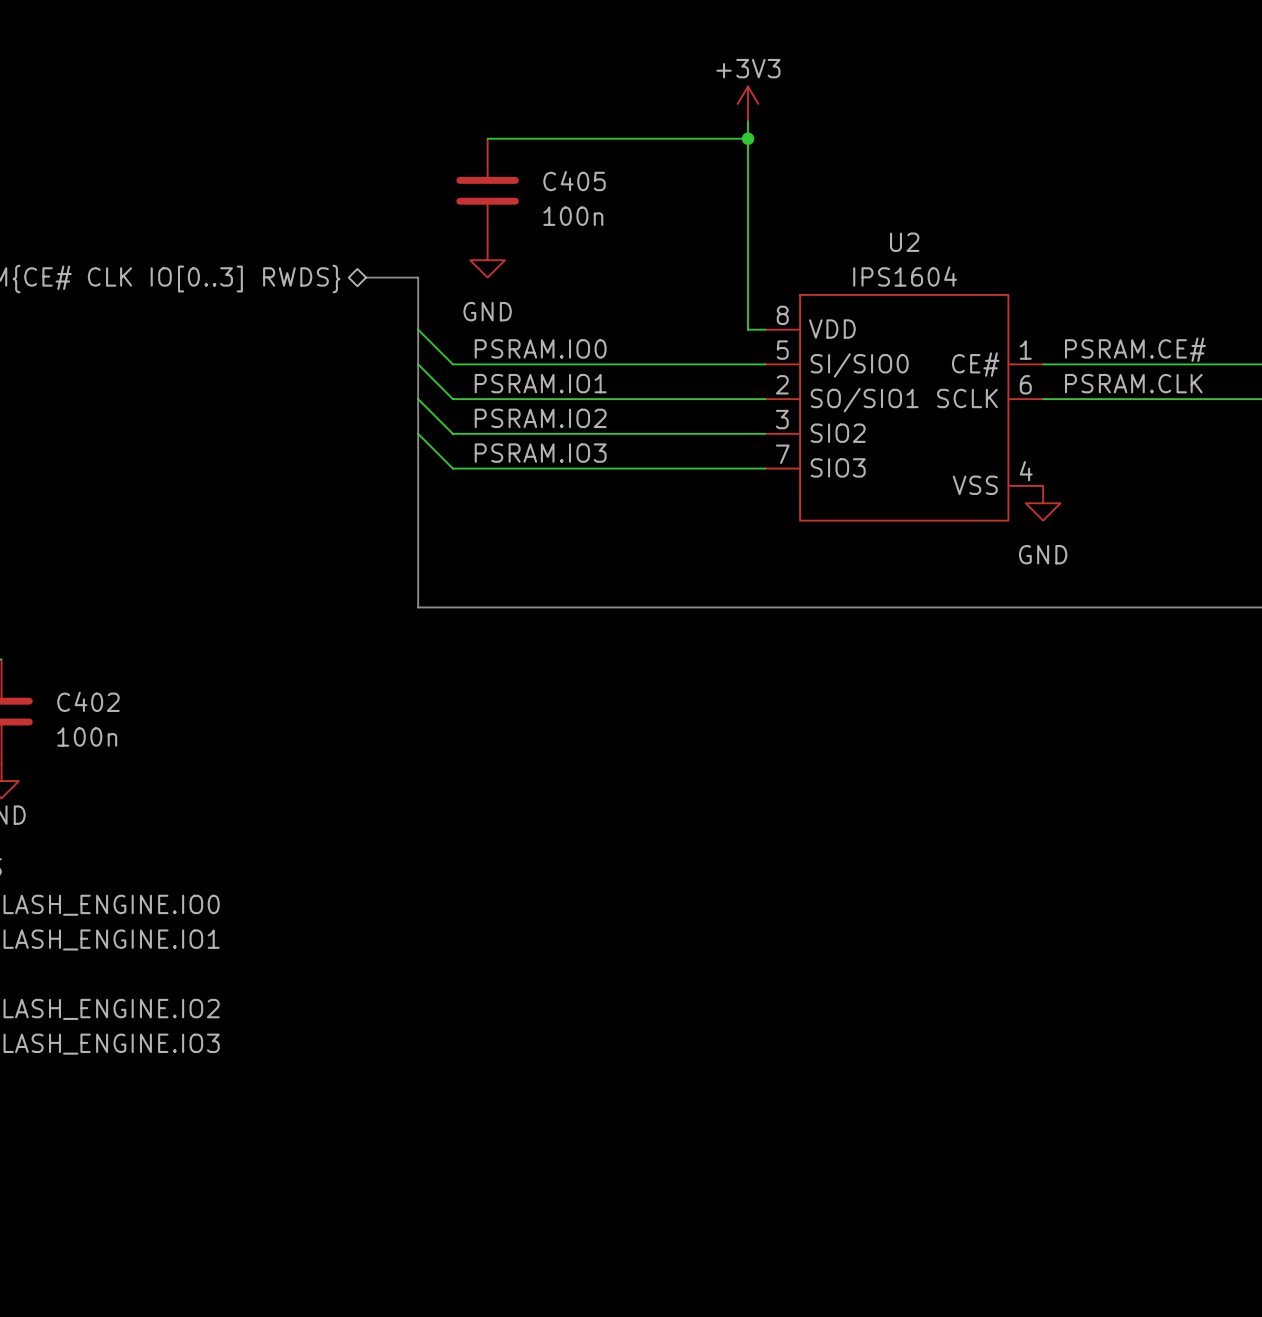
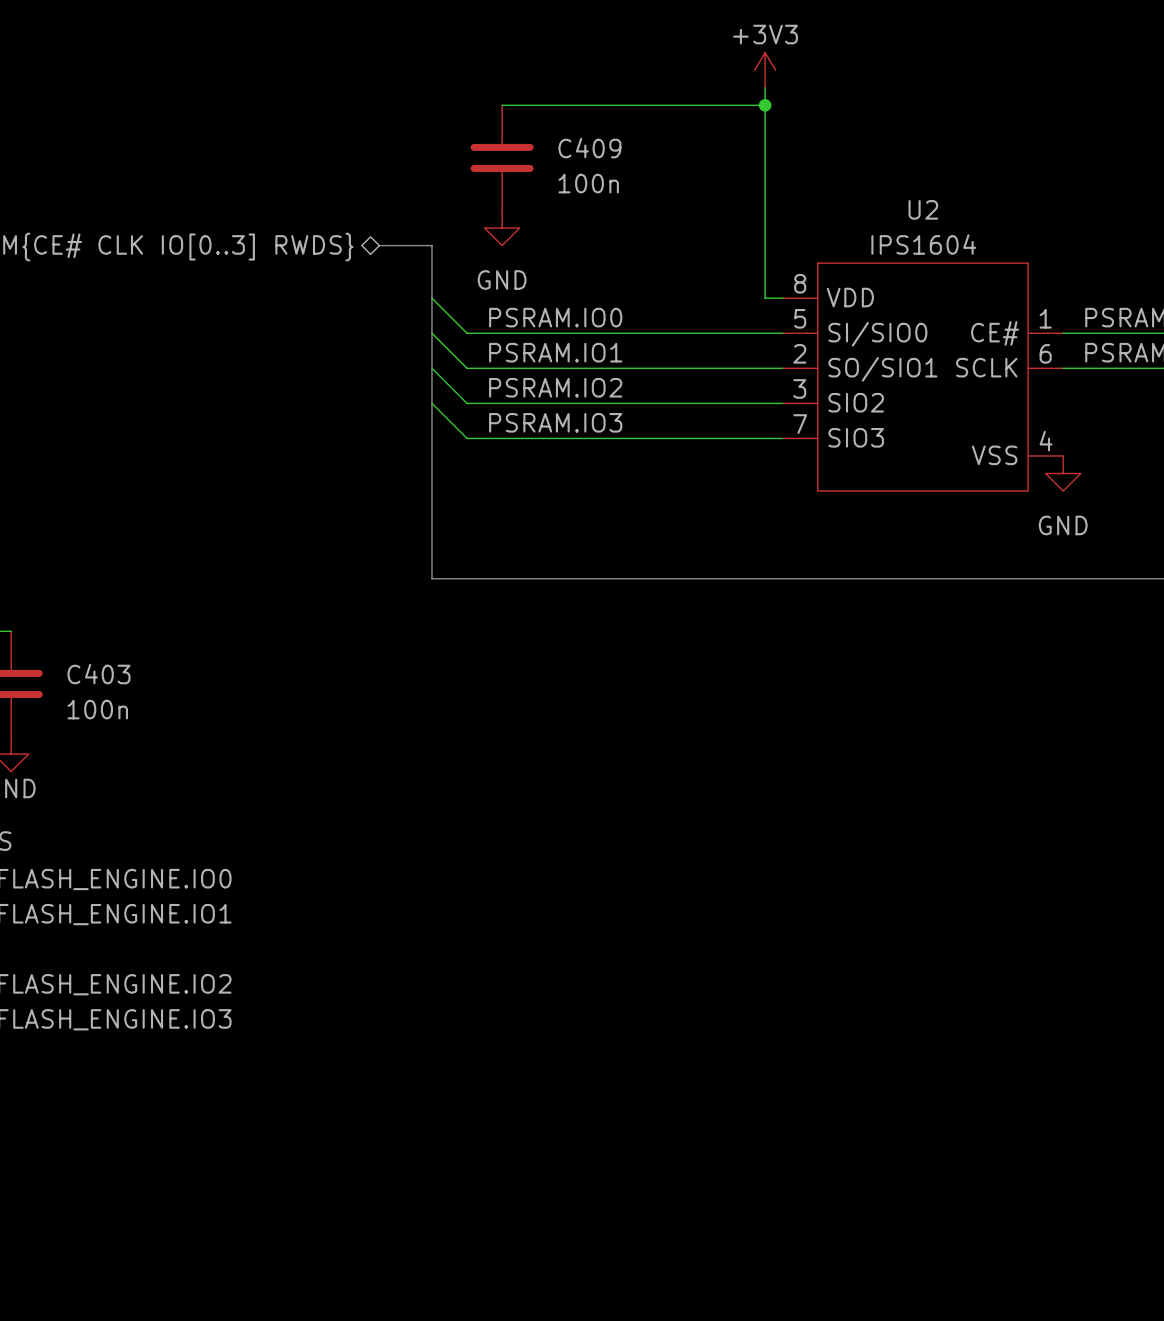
C405 name: C405 (574, 181) -> C409 (589, 148)
C402 name: C402 (88, 701) -> C403 (98, 674)

